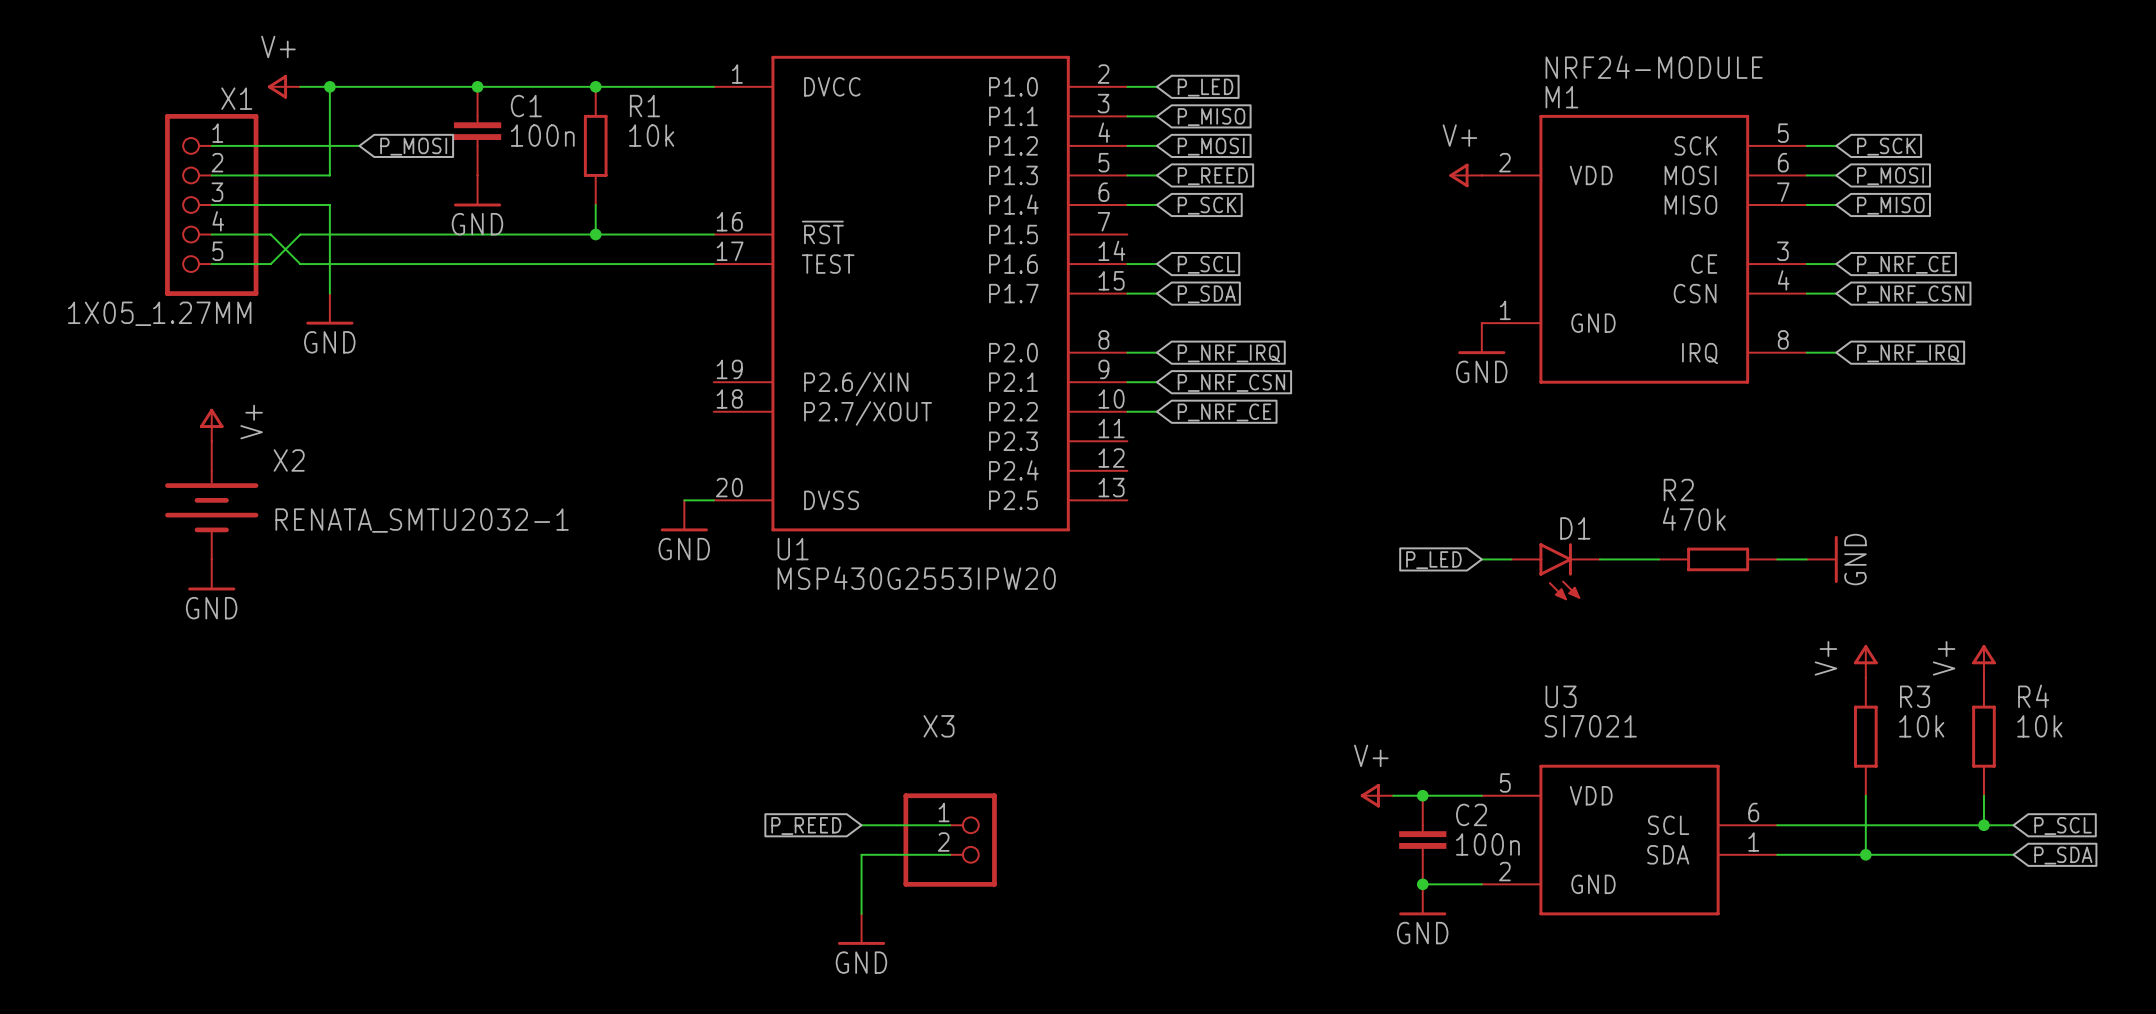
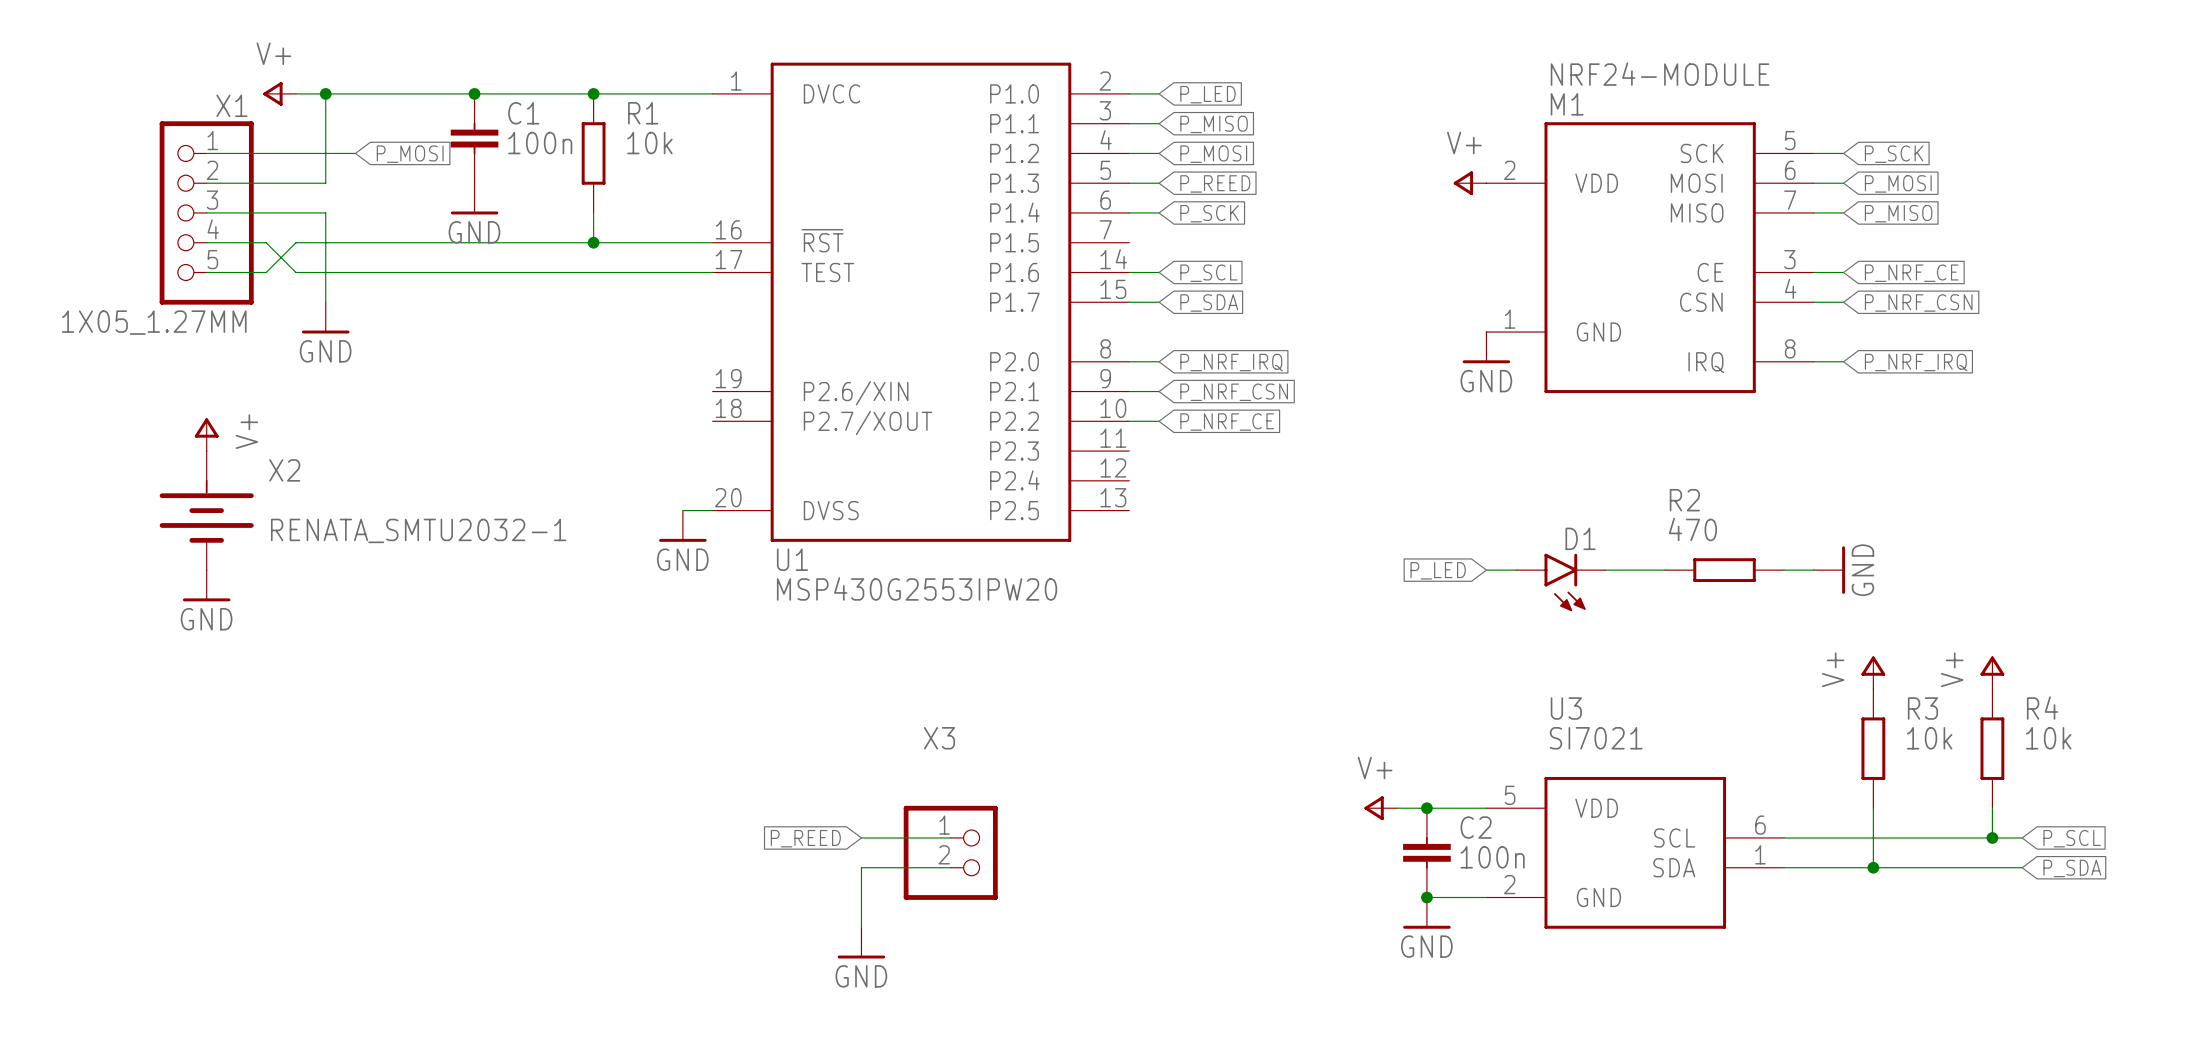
R2 value: 470k (1694, 519) -> 470 (1692, 529)

